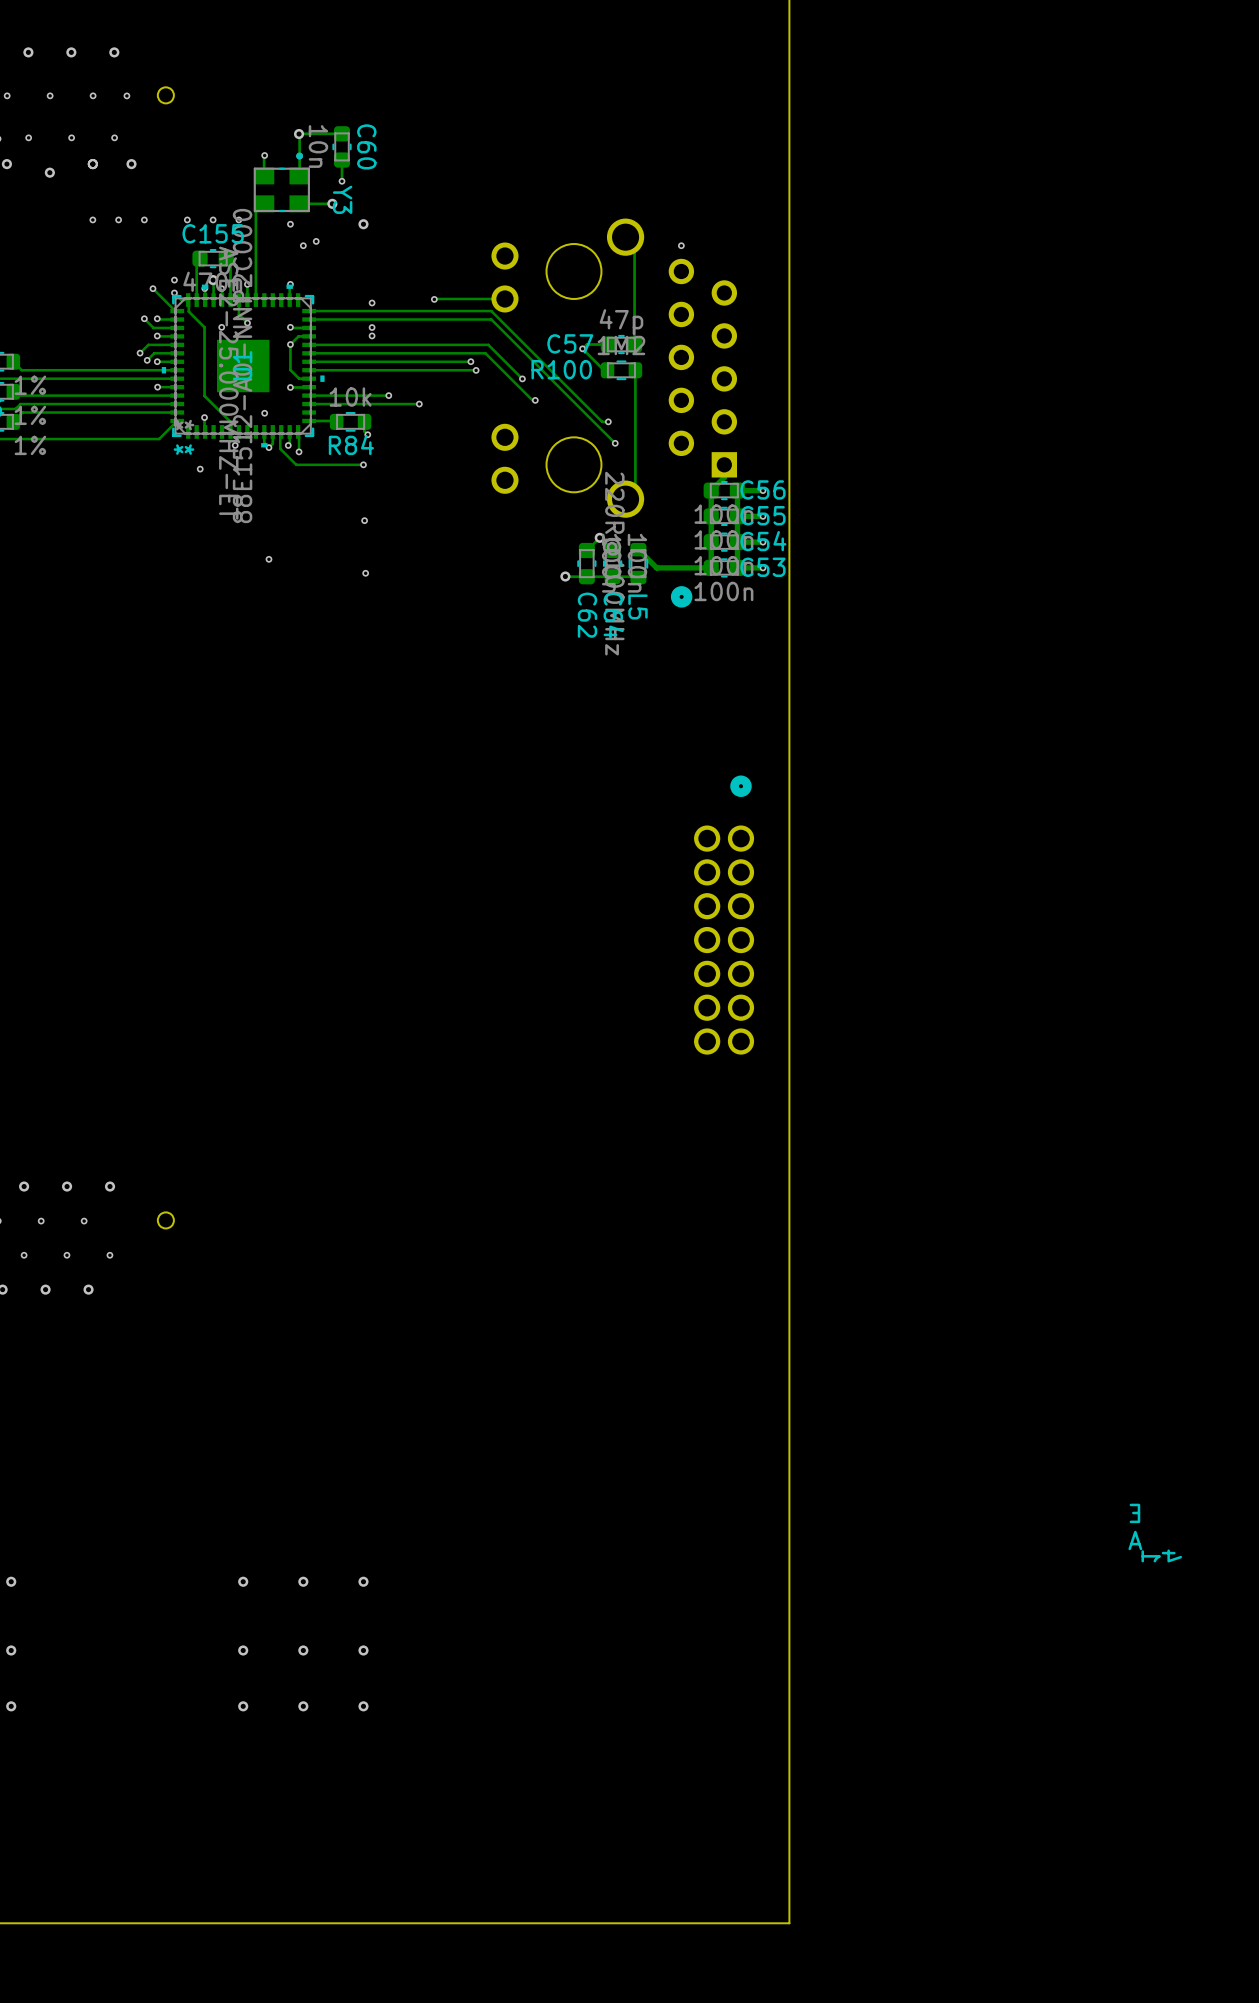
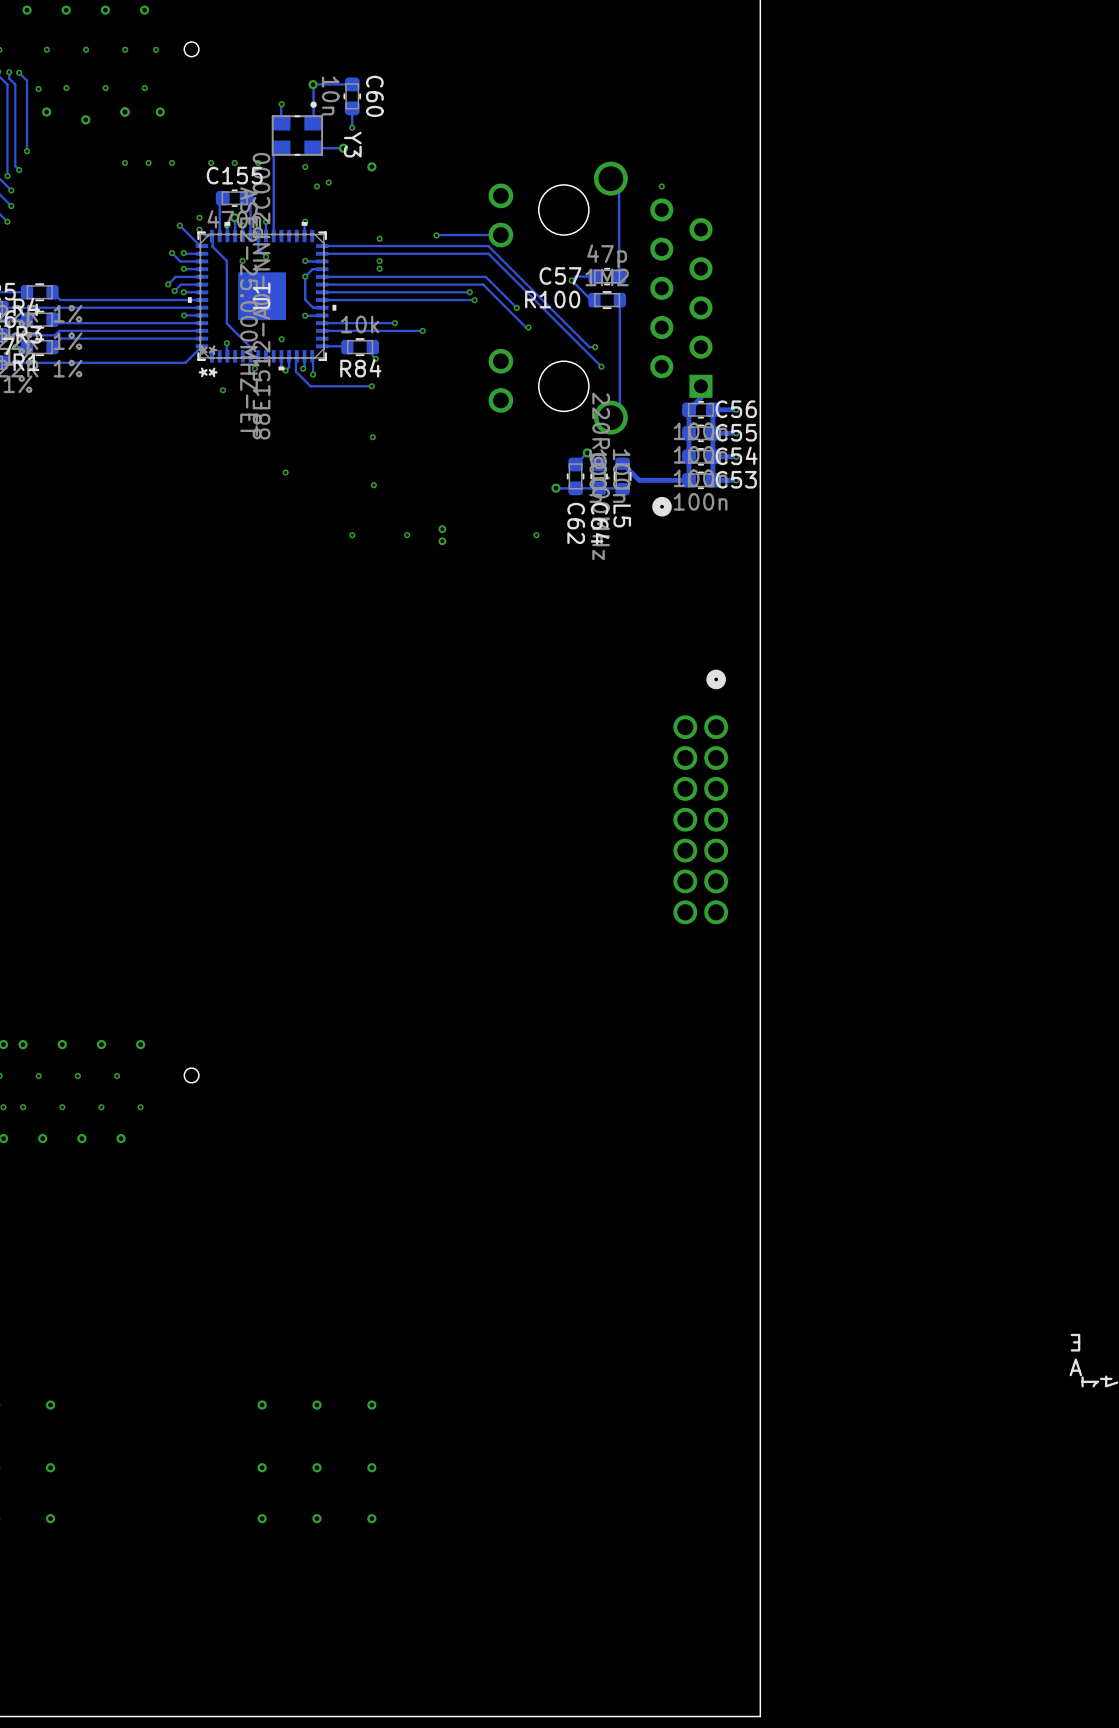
via: none -> (352, 535)
via: none -> (407, 535)
part: none -> (442, 535)
via: none -> (536, 535)

